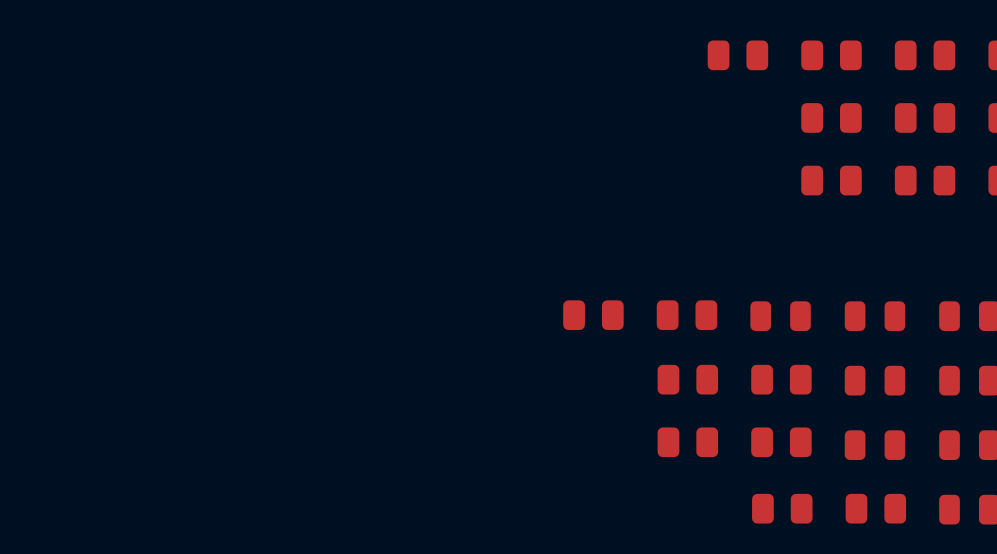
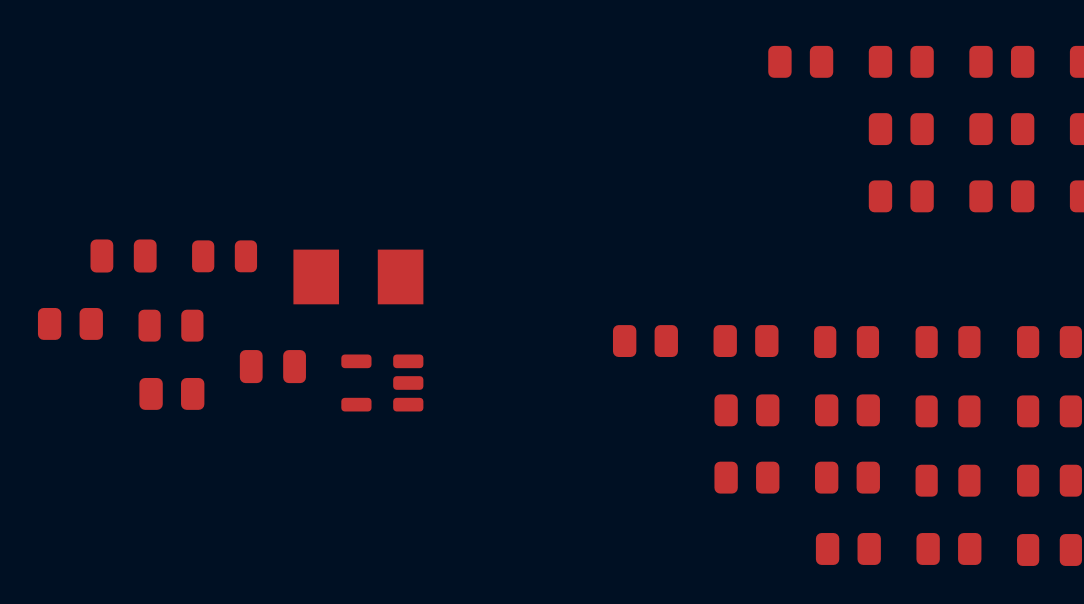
part: none -> (123, 255)
part: none -> (224, 256)
part: none -> (358, 276)
part: none -> (70, 323)
part: none -> (170, 325)
part: none -> (272, 366)
part: none -> (382, 382)
part: none -> (171, 393)

